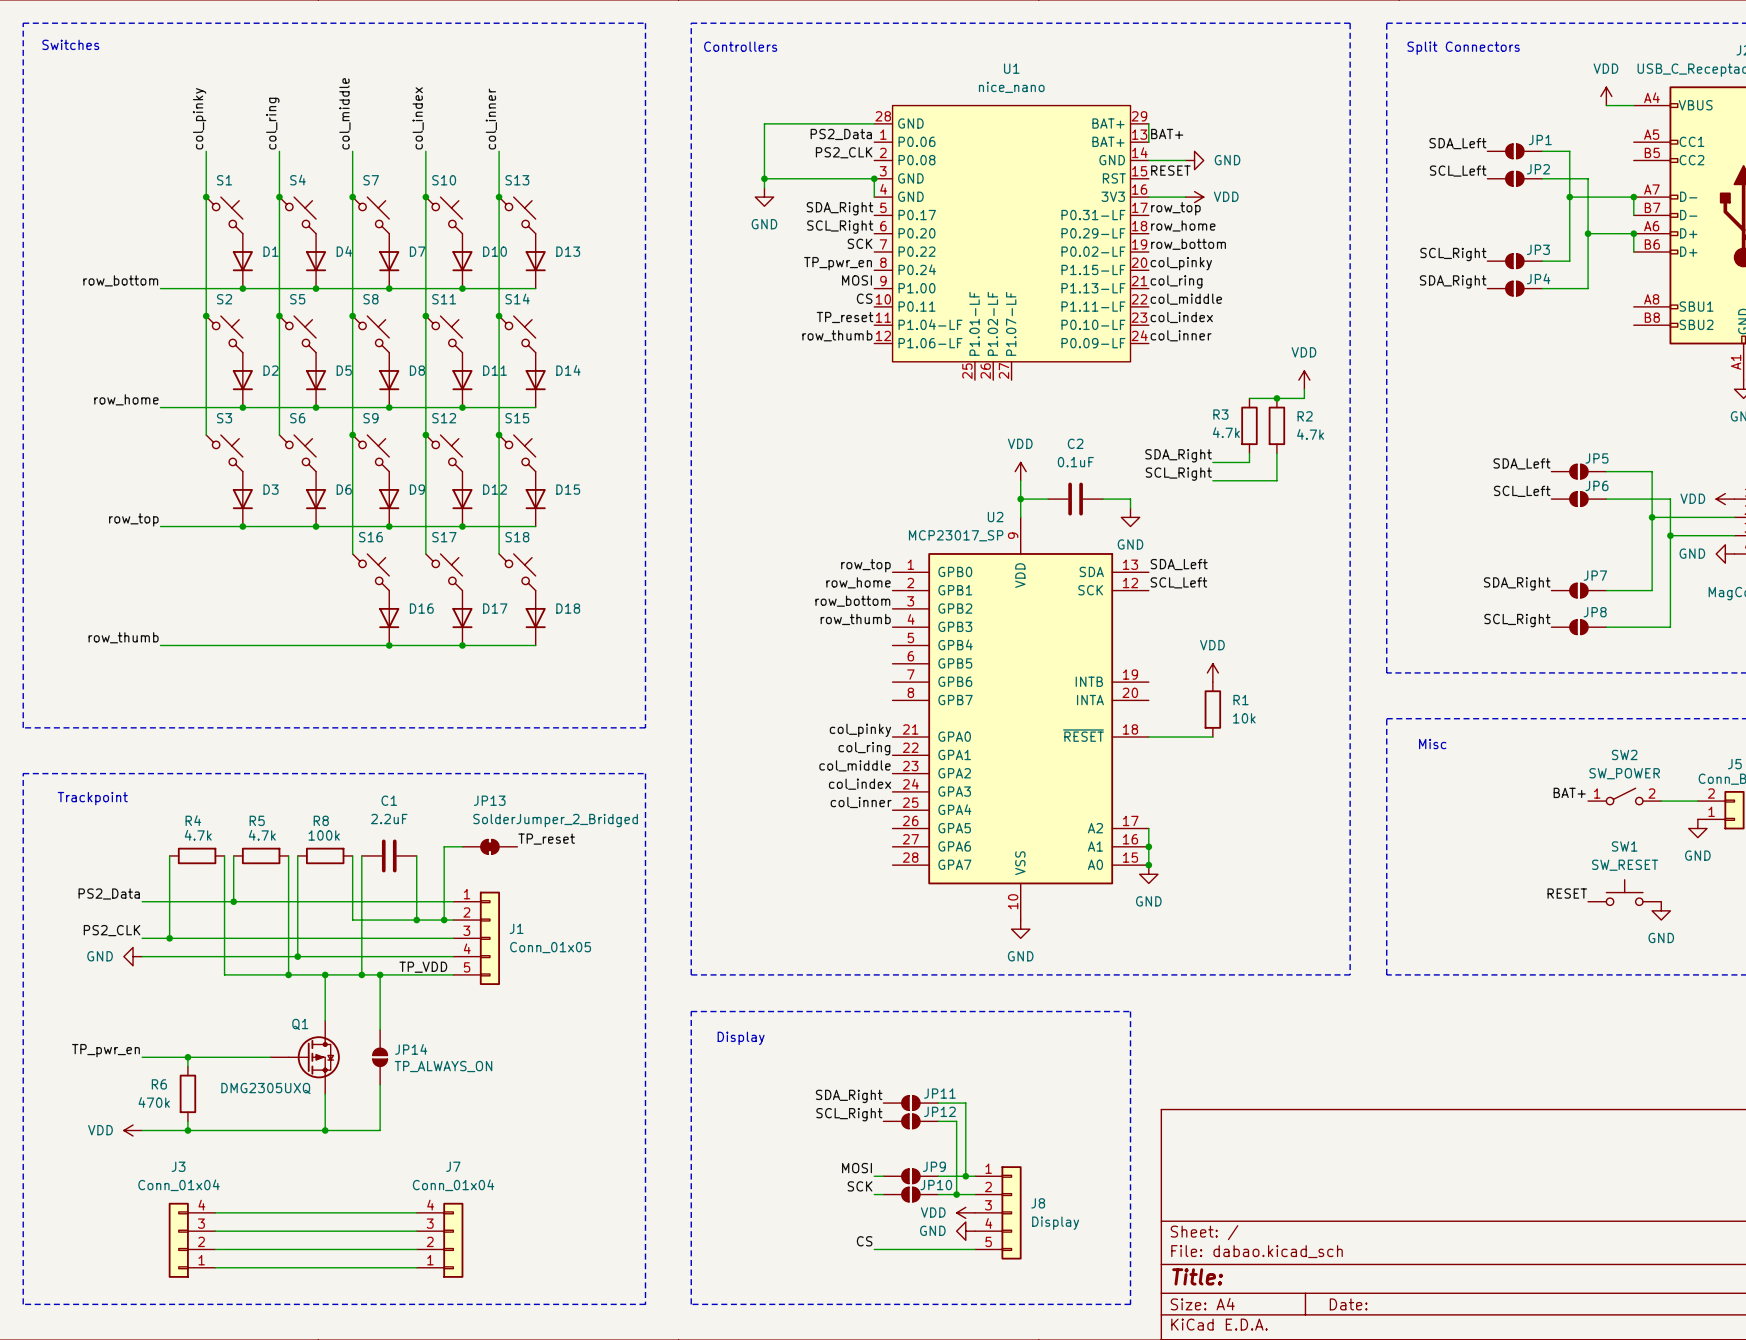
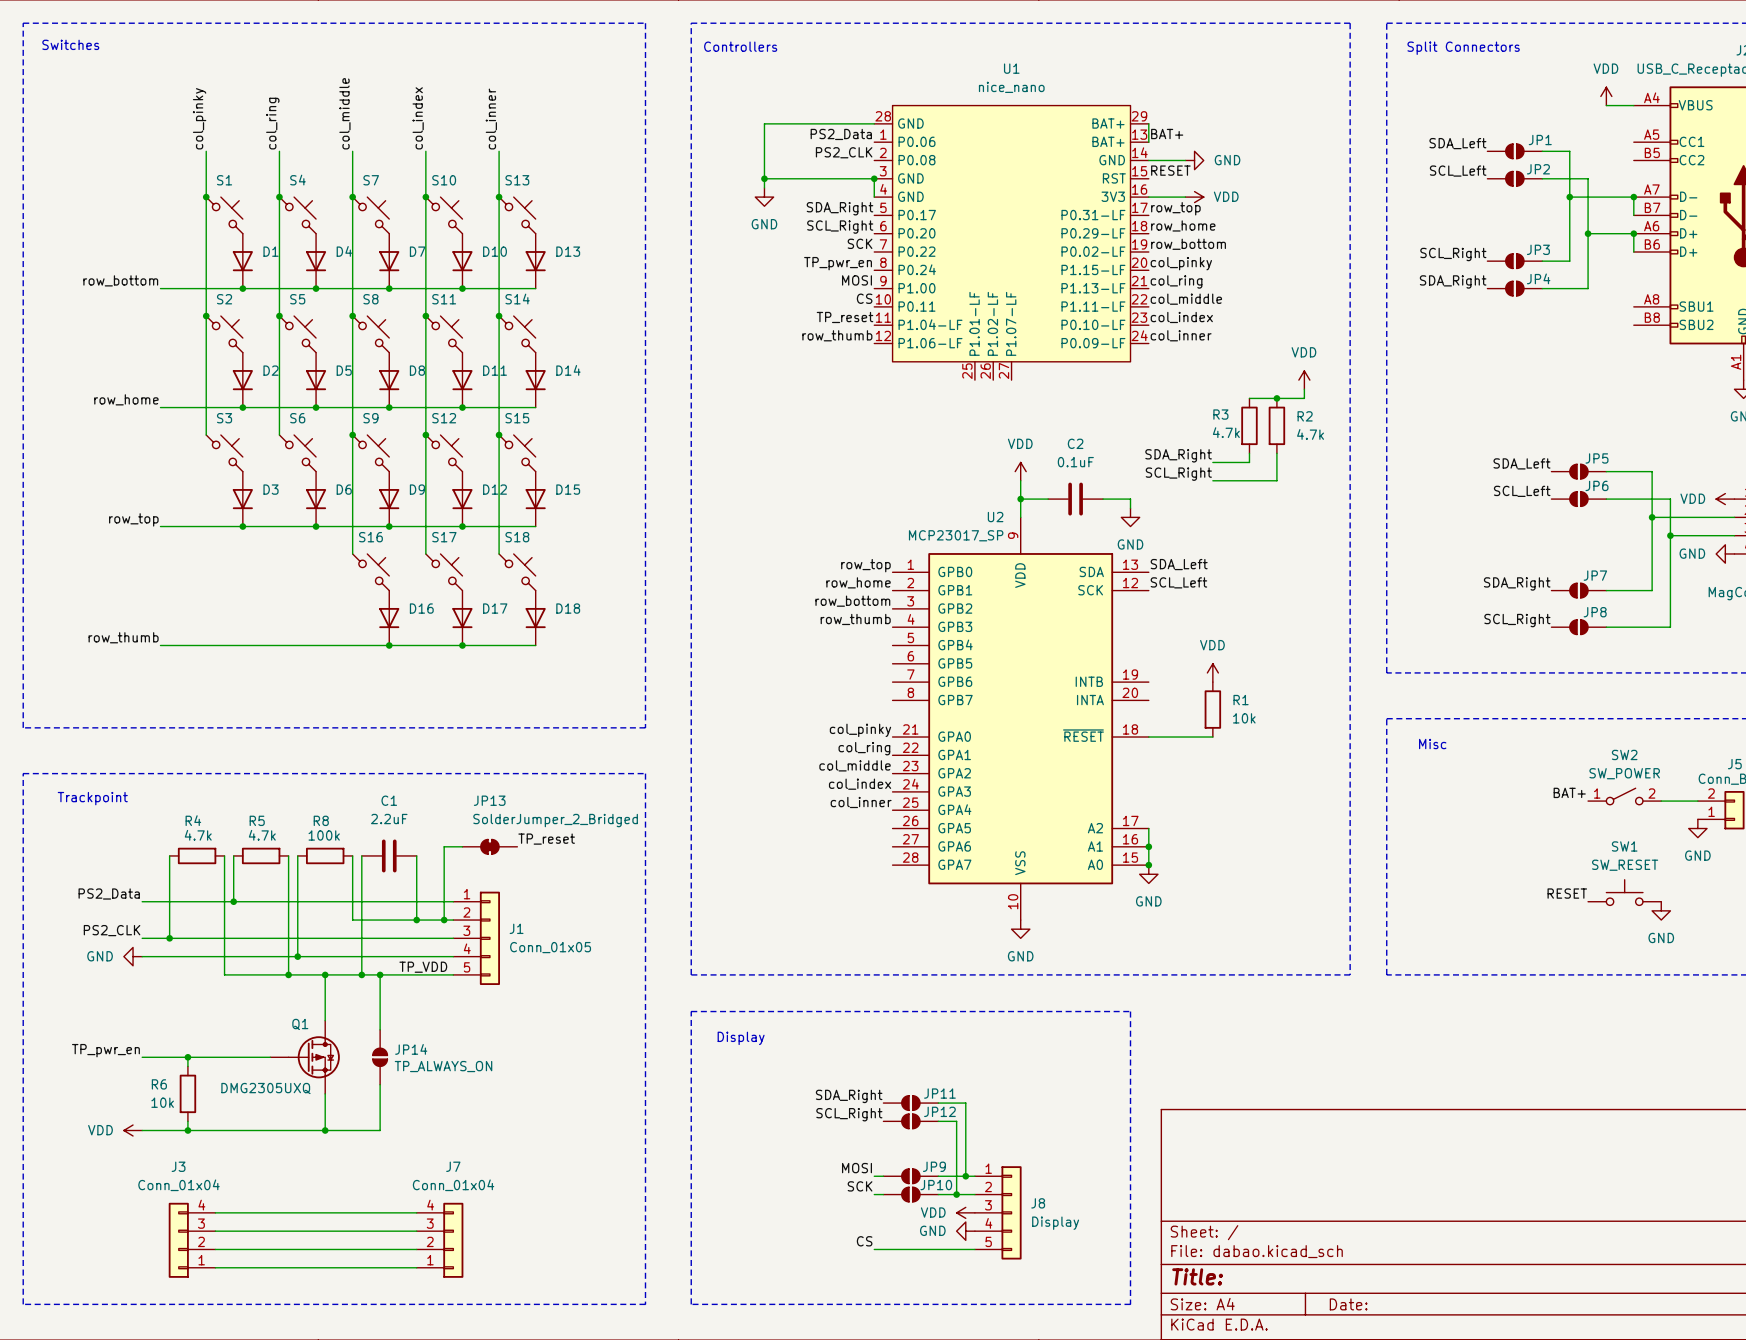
R6 value: 470k (154, 1102) -> 10k (162, 1102)

